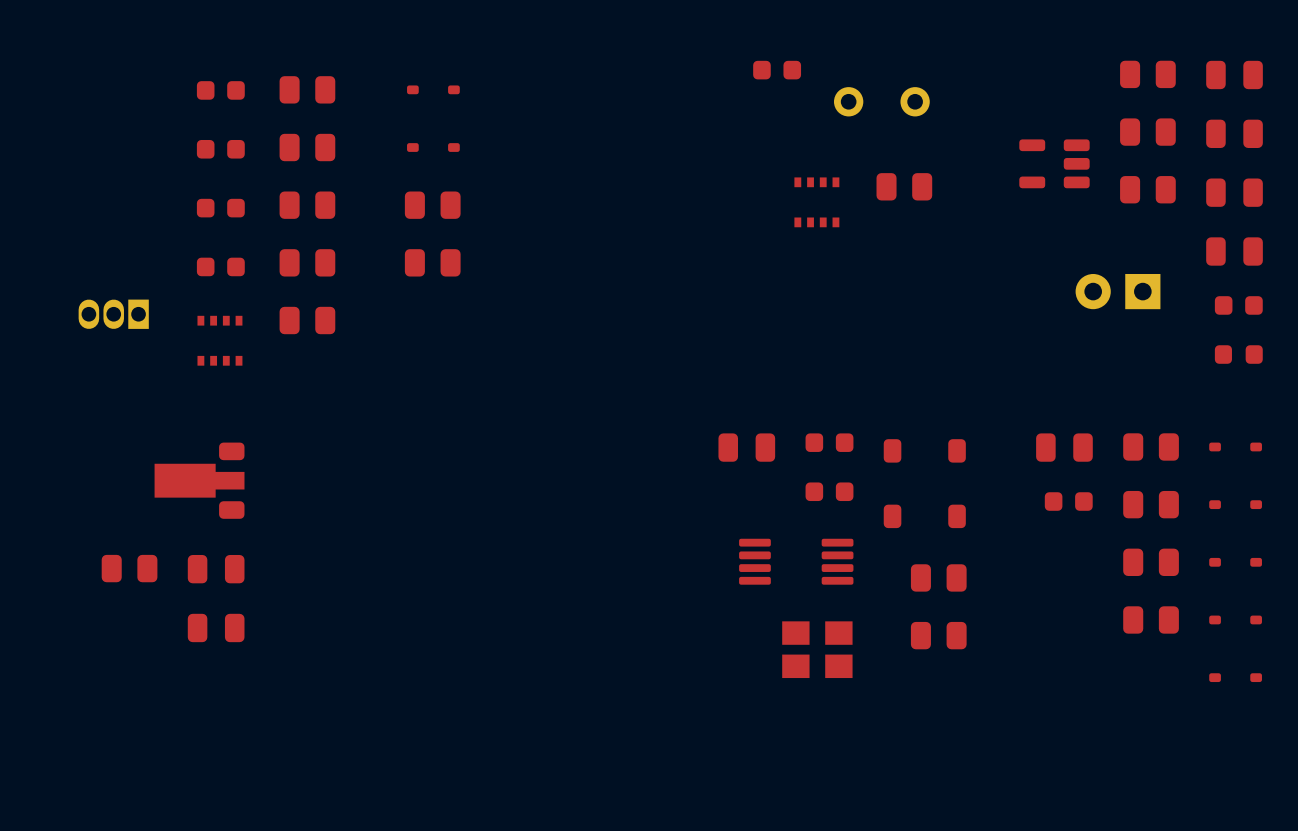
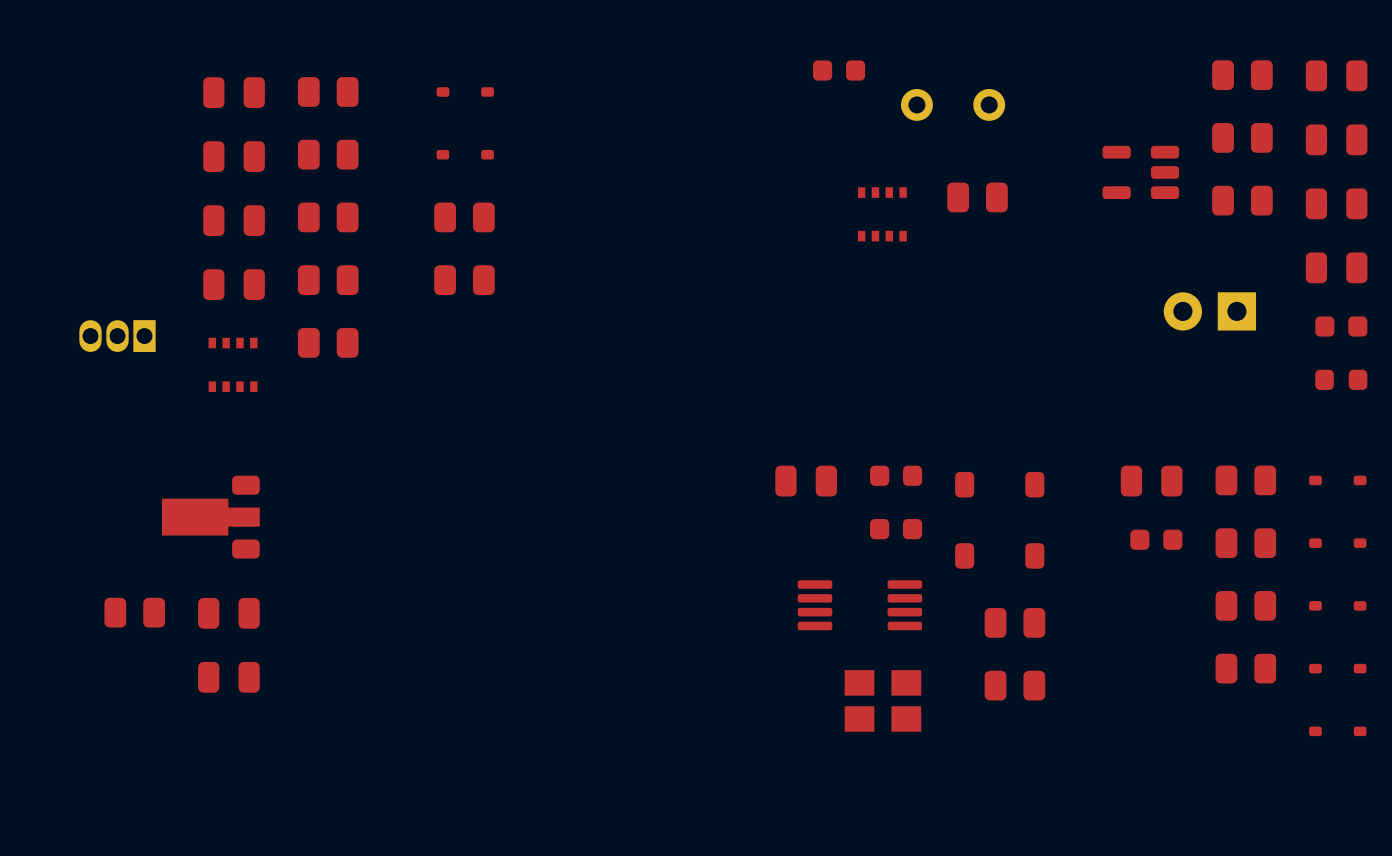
part footprint: [196, 81, 245, 100] -> [203, 77, 265, 109]
part footprint: [196, 139, 245, 159] -> [203, 141, 265, 173]
part footprint: [196, 198, 245, 218] -> [203, 205, 265, 237]
part footprint: [196, 257, 245, 277] -> [203, 269, 265, 301]

